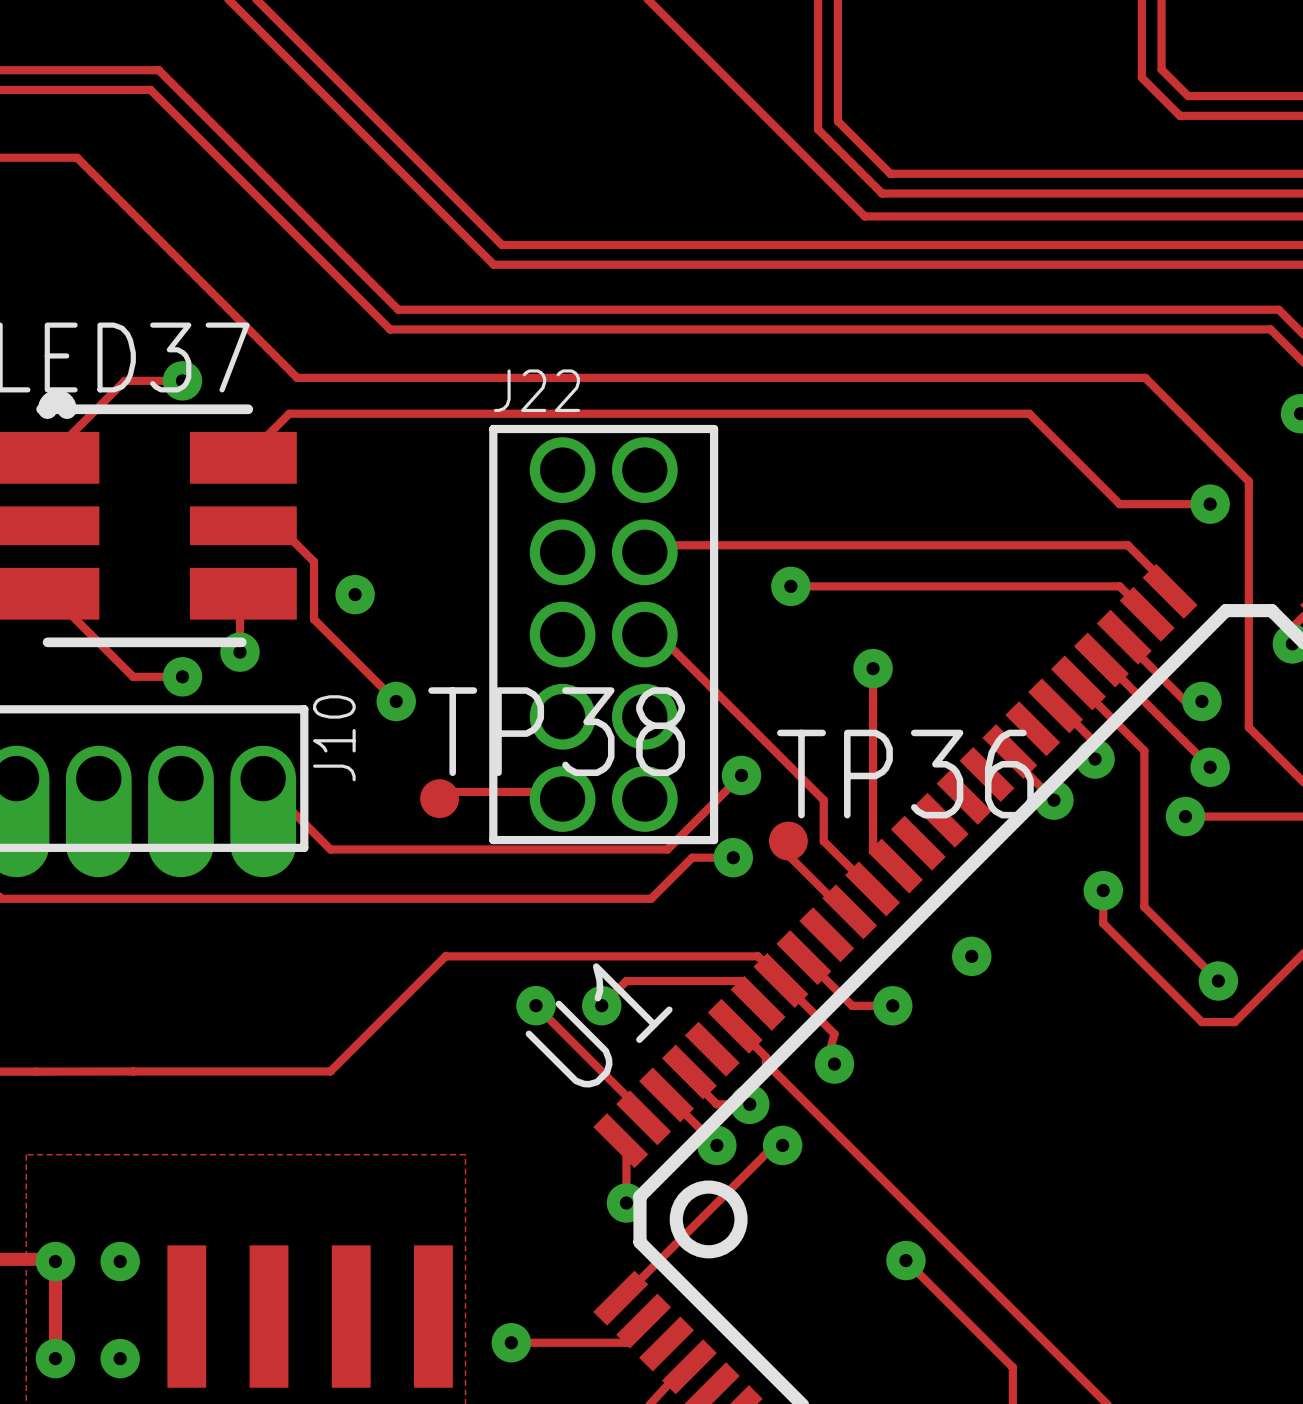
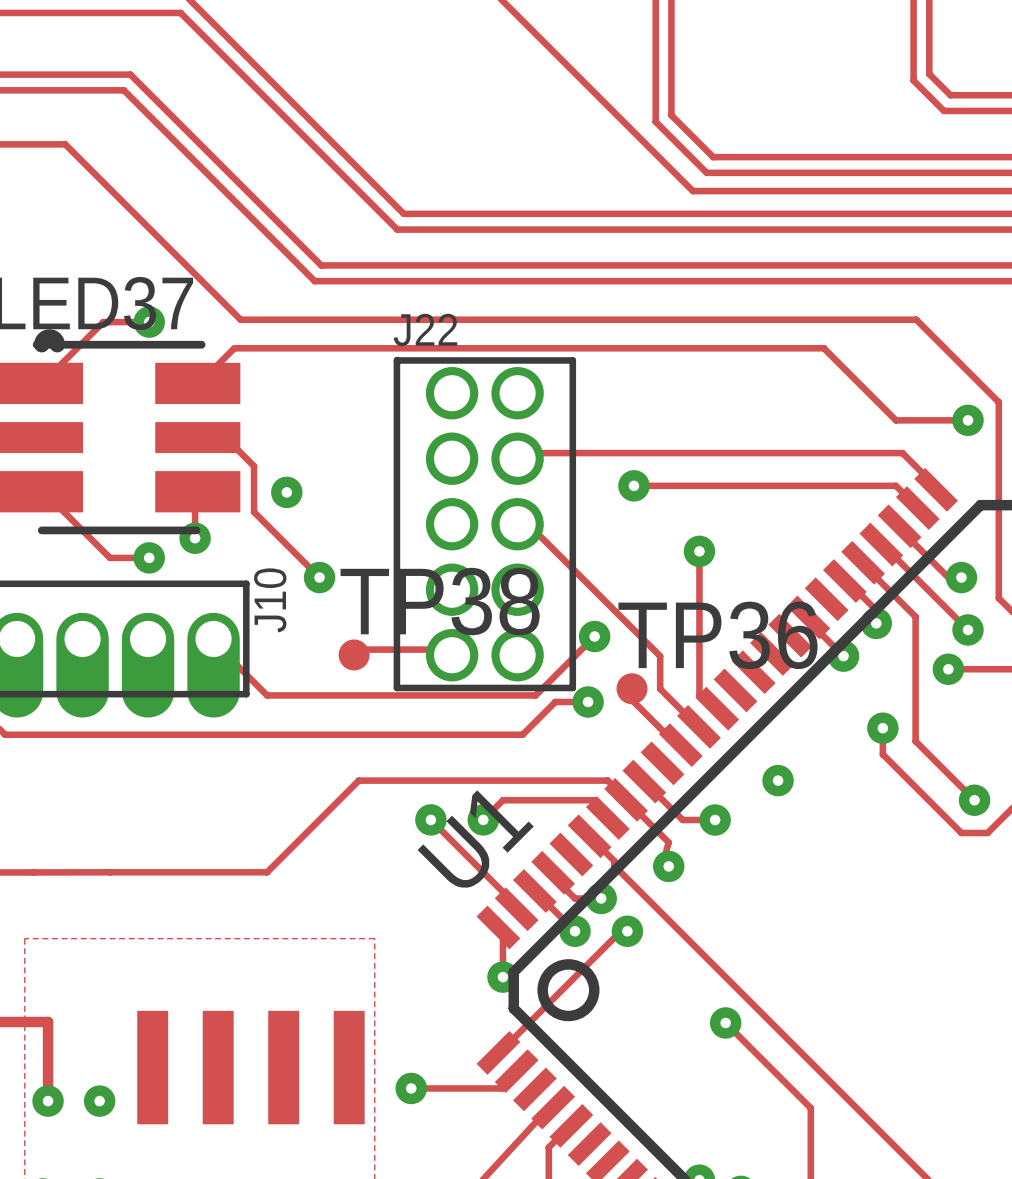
via: (55, 1261) -> none
via: (120, 1261) -> none

